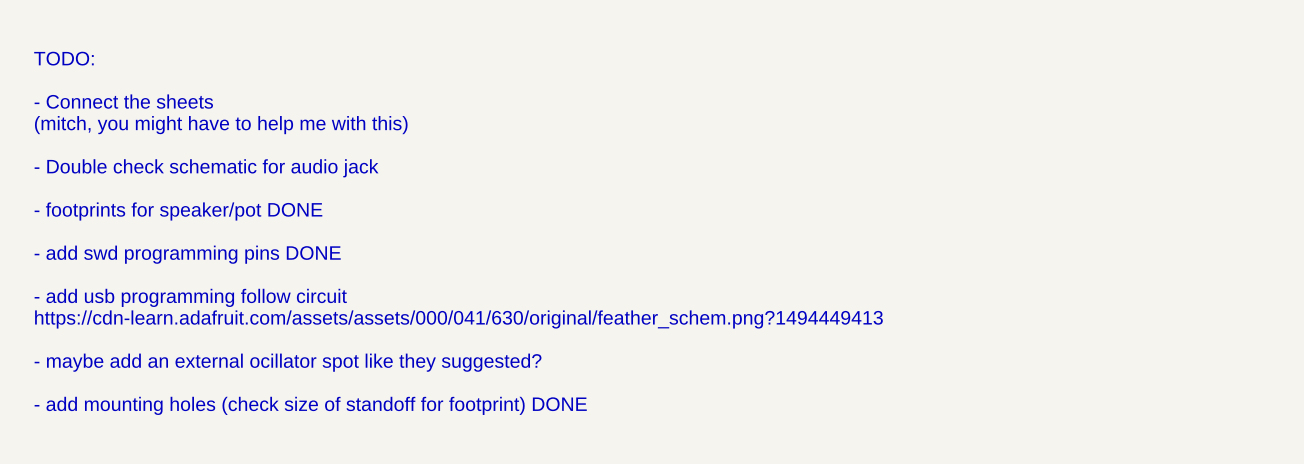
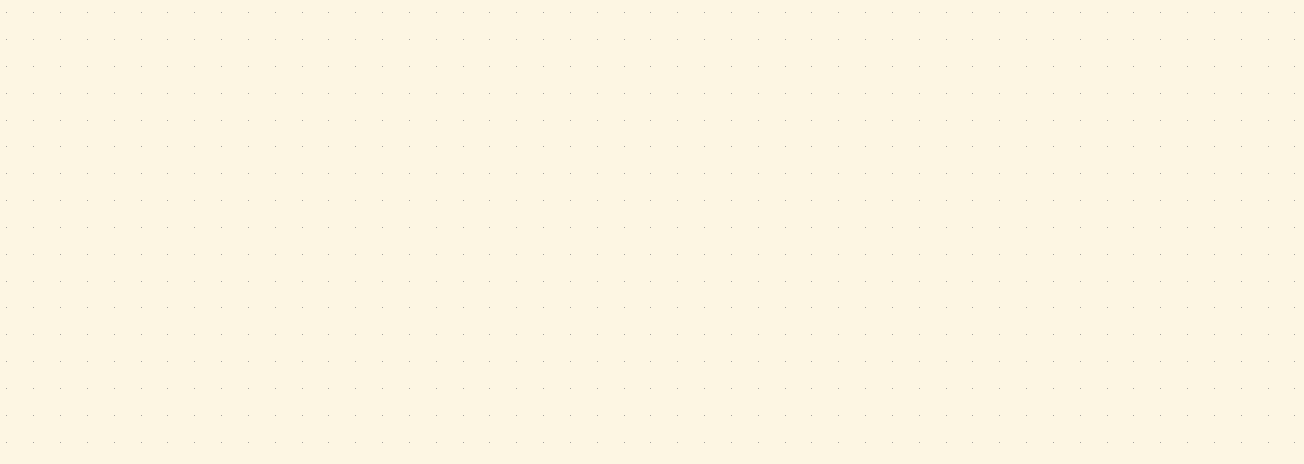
text: TODO: (63, 58) -> none
text: - Connect the sheets (123, 101) -> none
text: (mitch, you might have to help me with this) (221, 125) -> none
text: - Double check schematic for audio jack (206, 168) -> none
text: - footprints for speaker/pot DONE (178, 211) -> none
text: - add swd programming pins DONE (187, 254) -> none
text: - add usb programming follow circuit (190, 297) -> none
text: https://cdn-learn.adafruit.com/assets/assets/000/041/630/original/feather_schem.png?1494449413 (458, 319) -> none
text: - maybe add an external ocillator spot like they suggested? (288, 362) -> none
text: - add mounting holes (check size of standoff for footprint) DONE (310, 405) -> none

